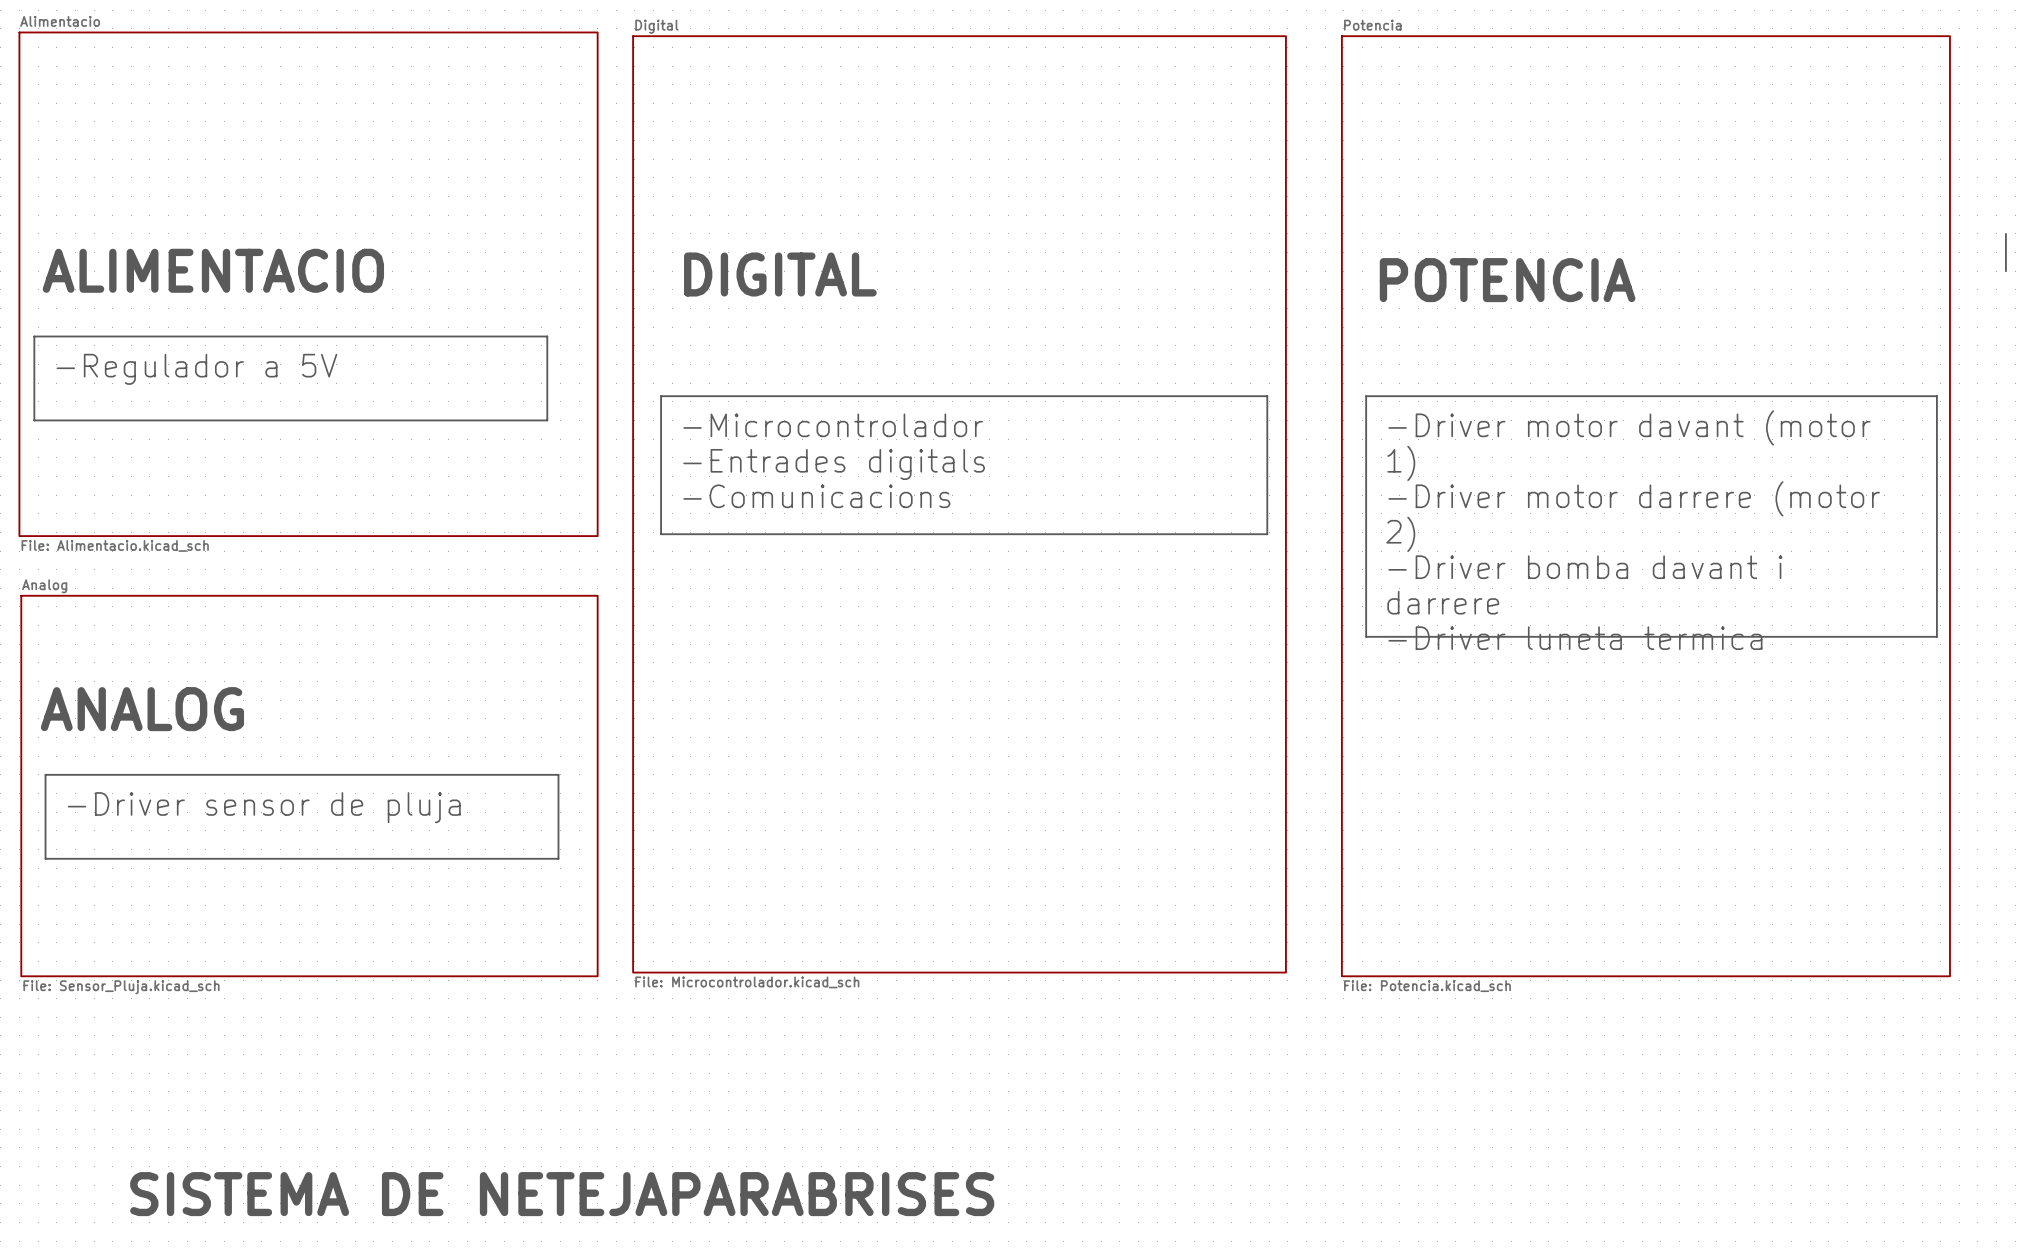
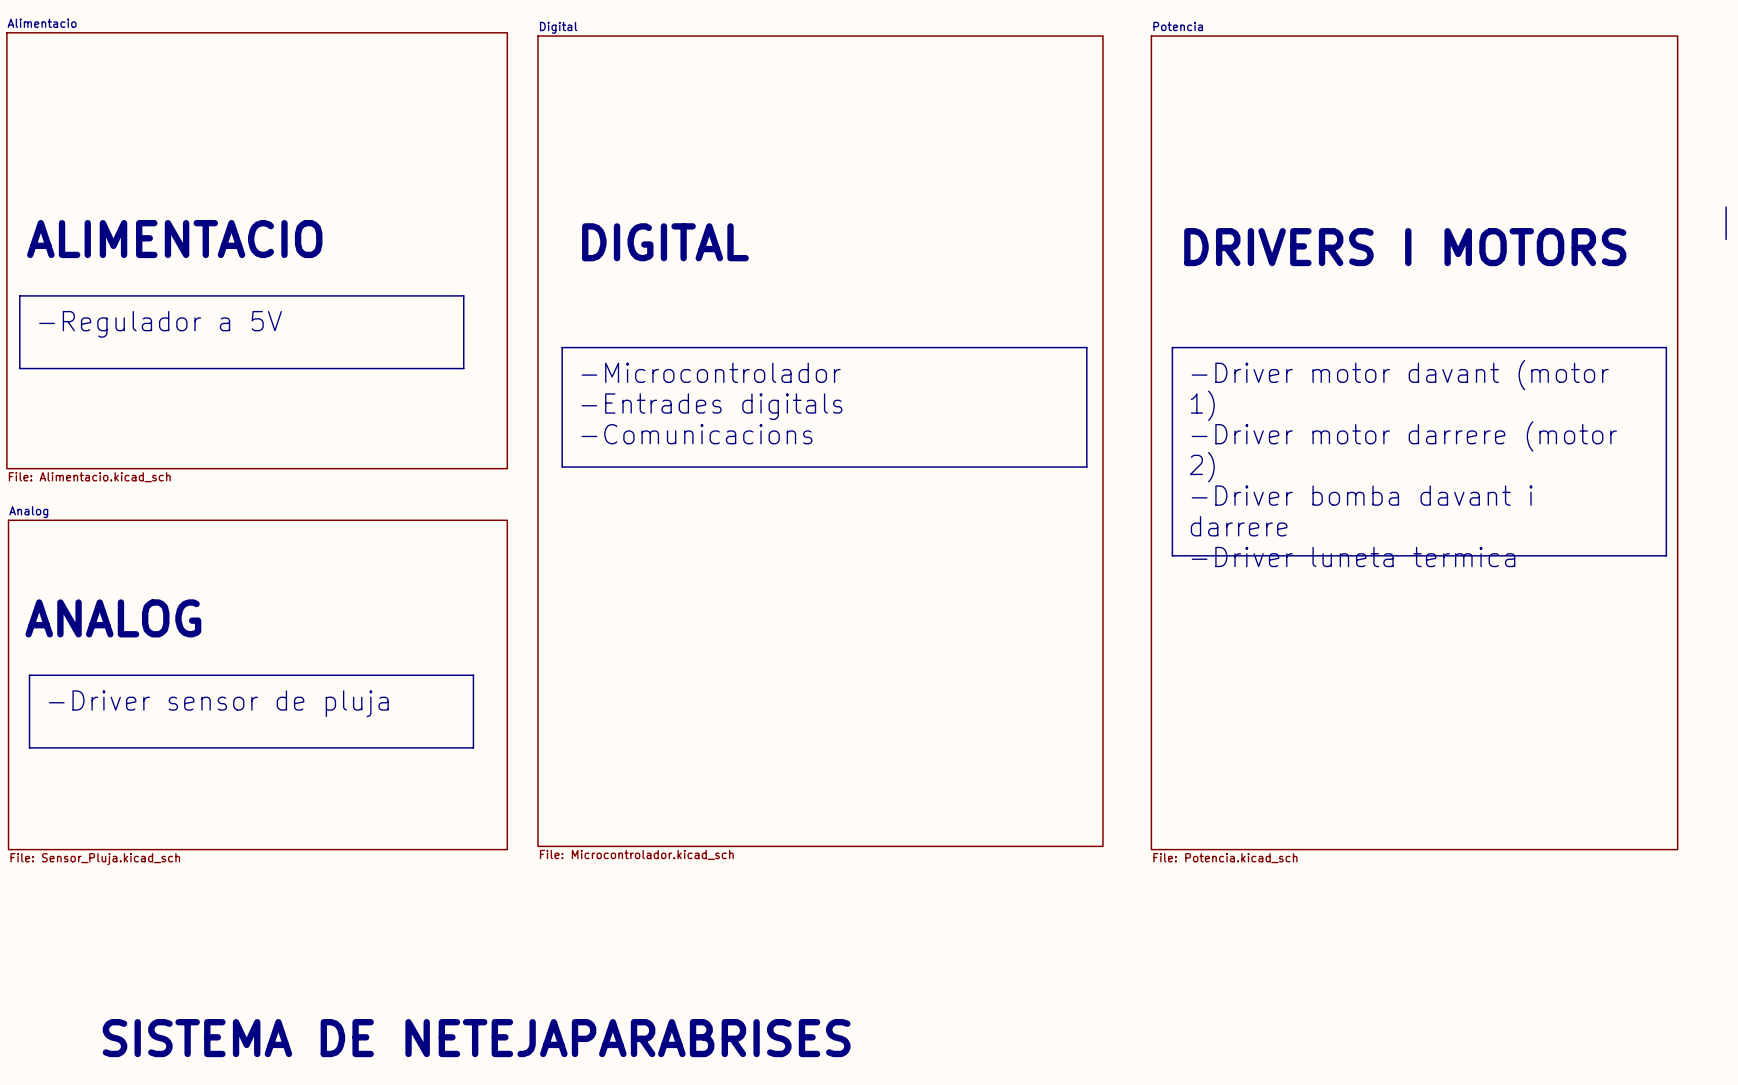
text: POTENCIA (1507, 280) -> DRIVERS I MOTORS (1405, 247)

